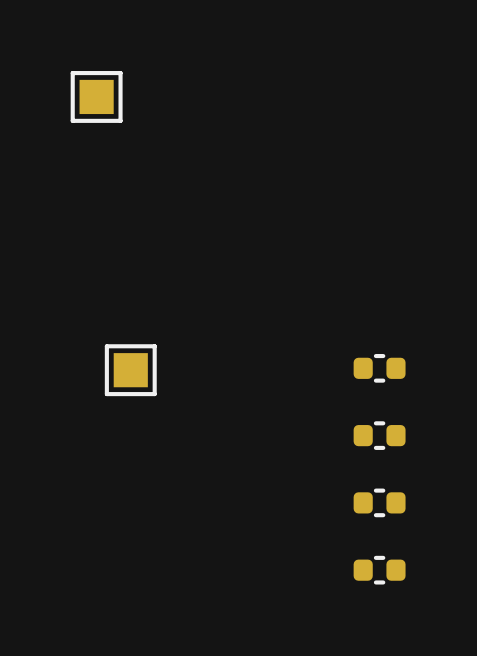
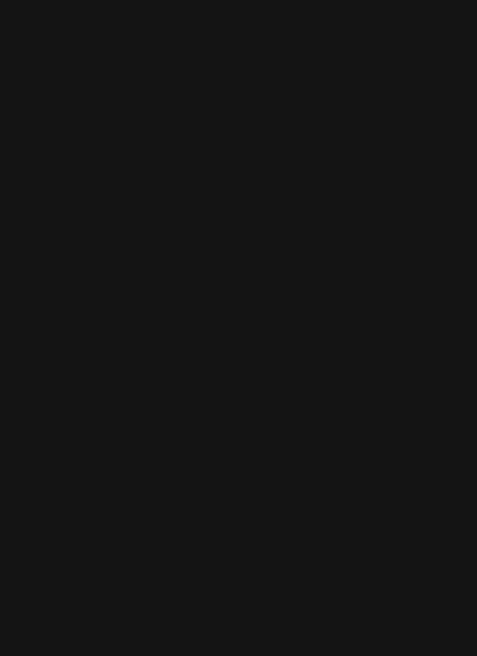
part: (96, 96) -> none
part: (379, 368) -> none
part: (130, 370) -> none
part: (379, 435) -> none
part: (379, 502) -> none
part: (379, 570) -> none

